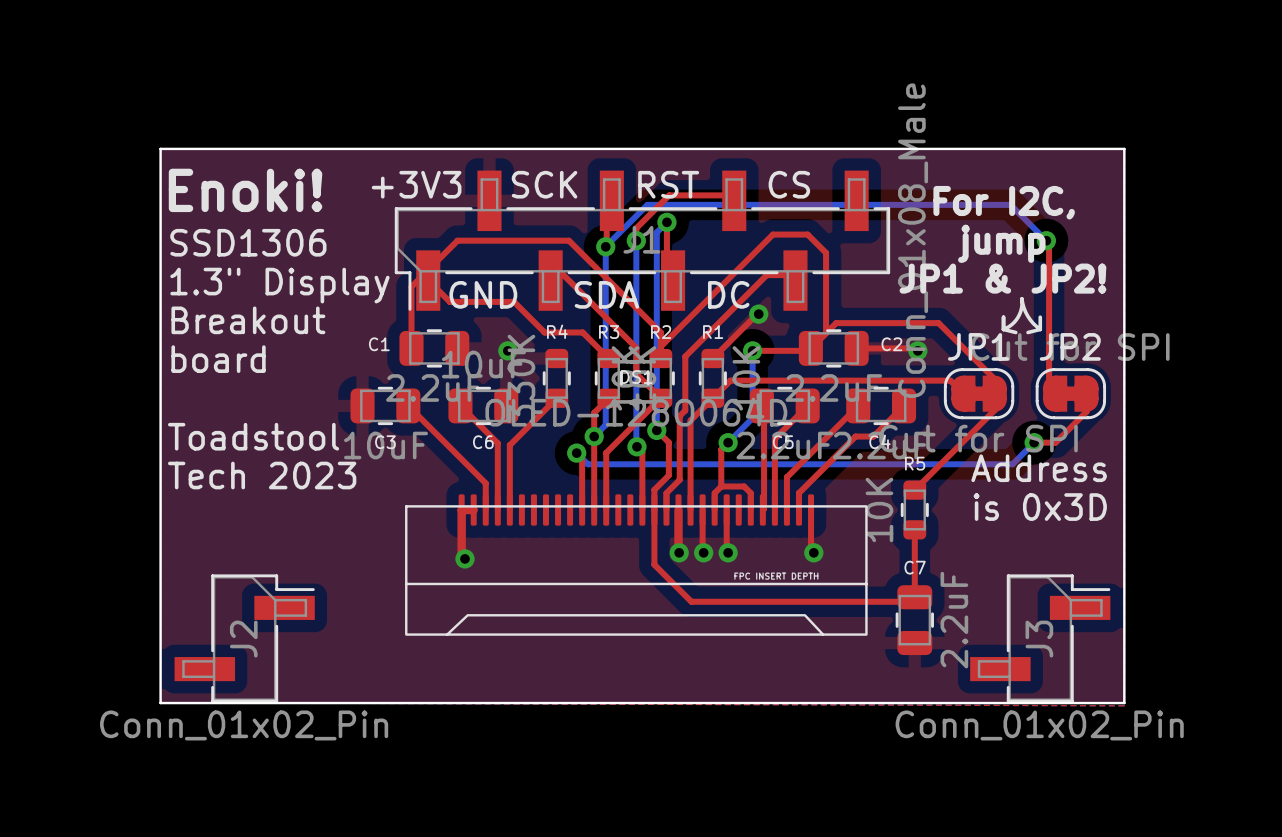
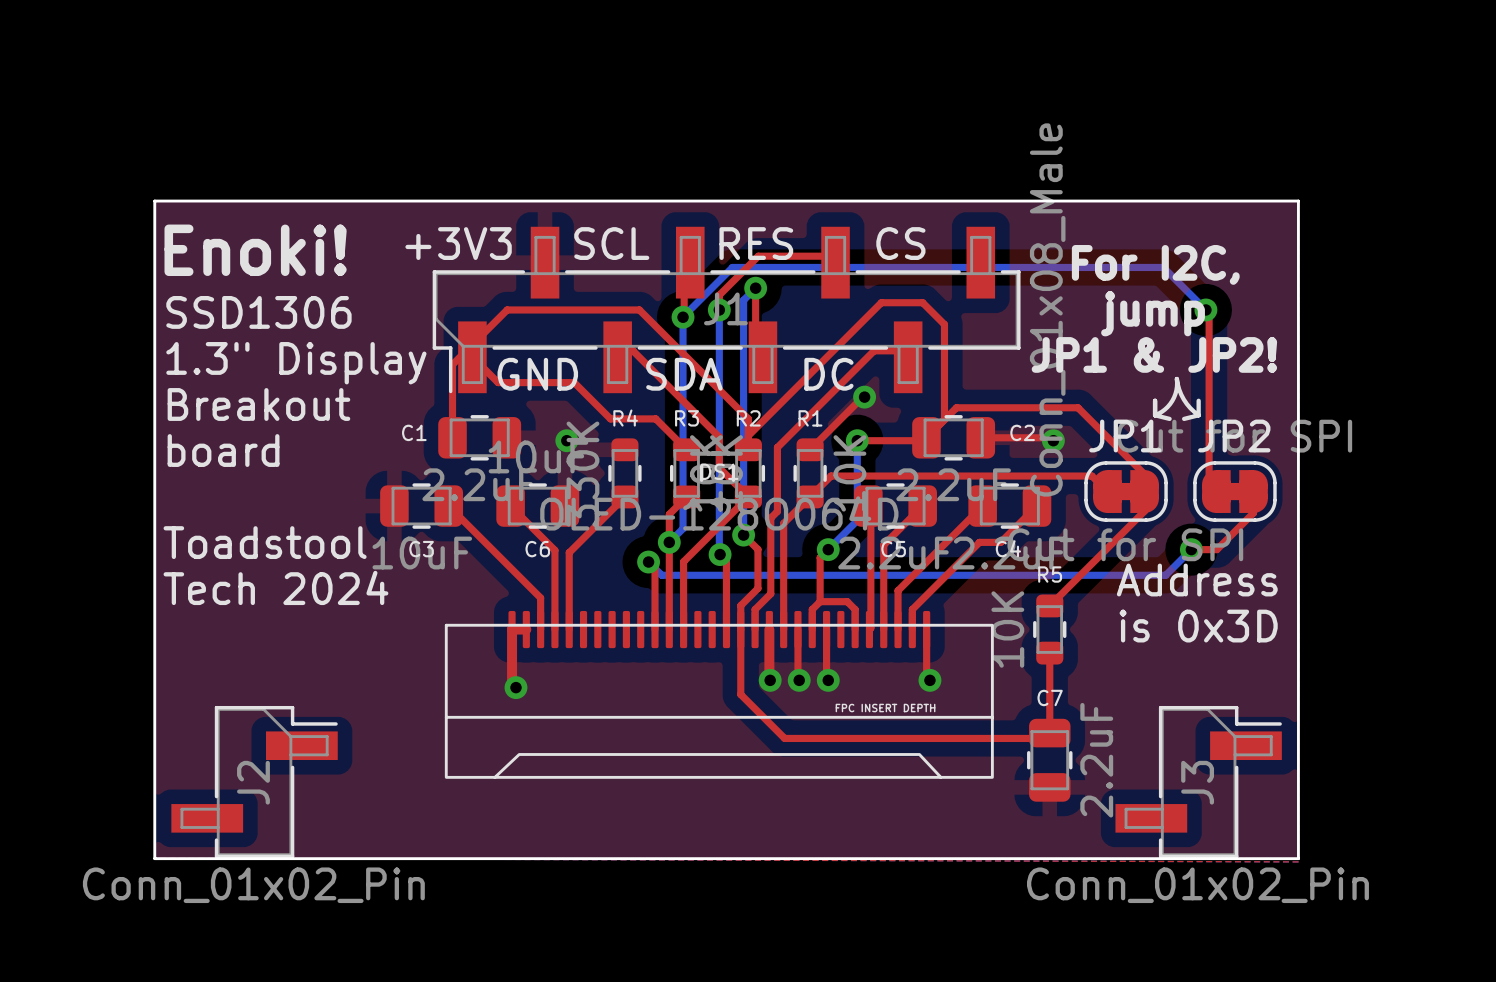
text: SCK (544, 184) -> SCL (611, 243)
text: RST (668, 184) -> RES (756, 243)
text: Tech 2023 (262, 475) -> Tech 2024 (275, 587)

